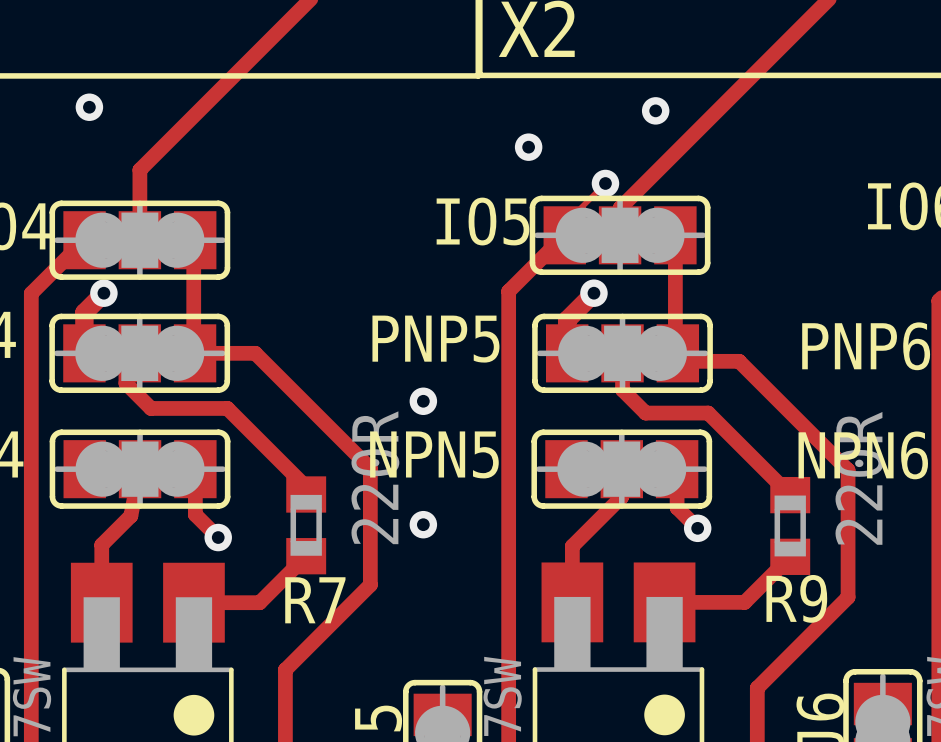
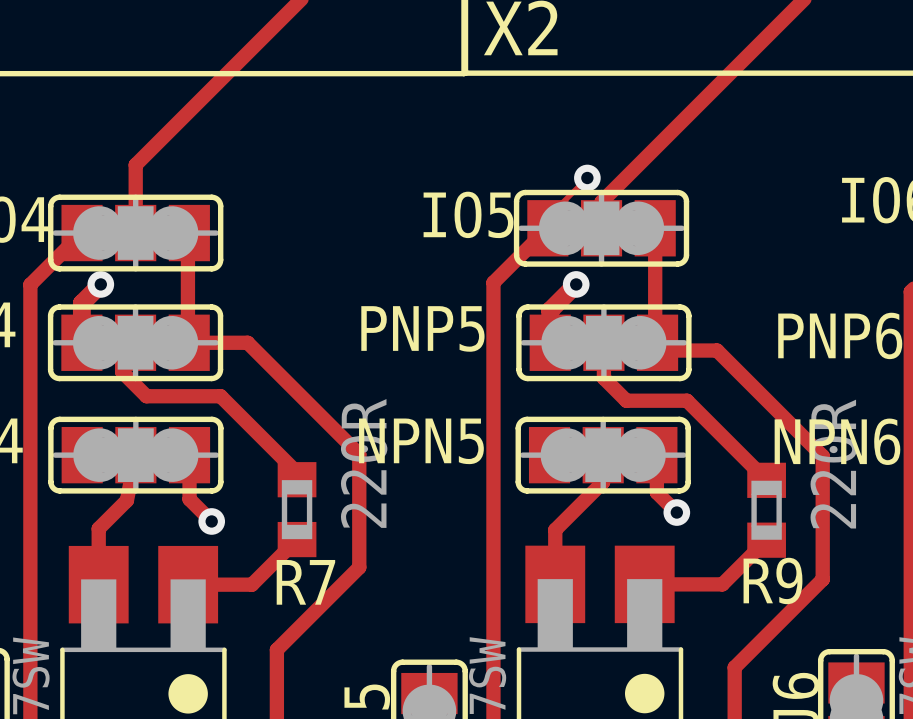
via: (89, 107) -> none
via: (655, 110) -> none
via: (528, 147) -> none
via: (423, 401) -> none
via: (423, 524) -> none

